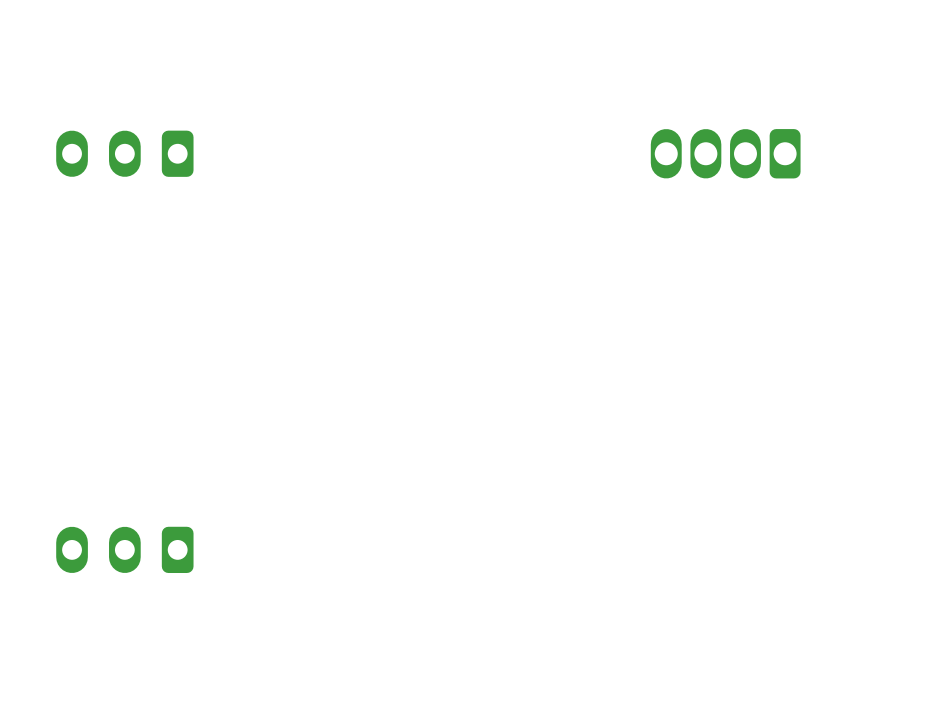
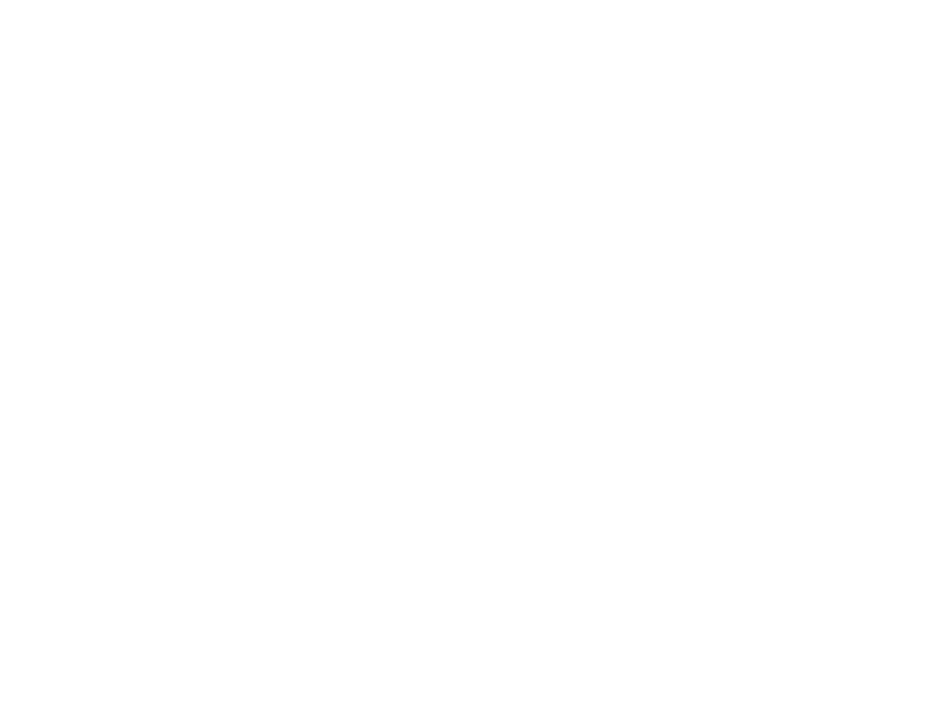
part: (124, 153) -> none
part: (725, 153) -> none
part: (124, 549) -> none

